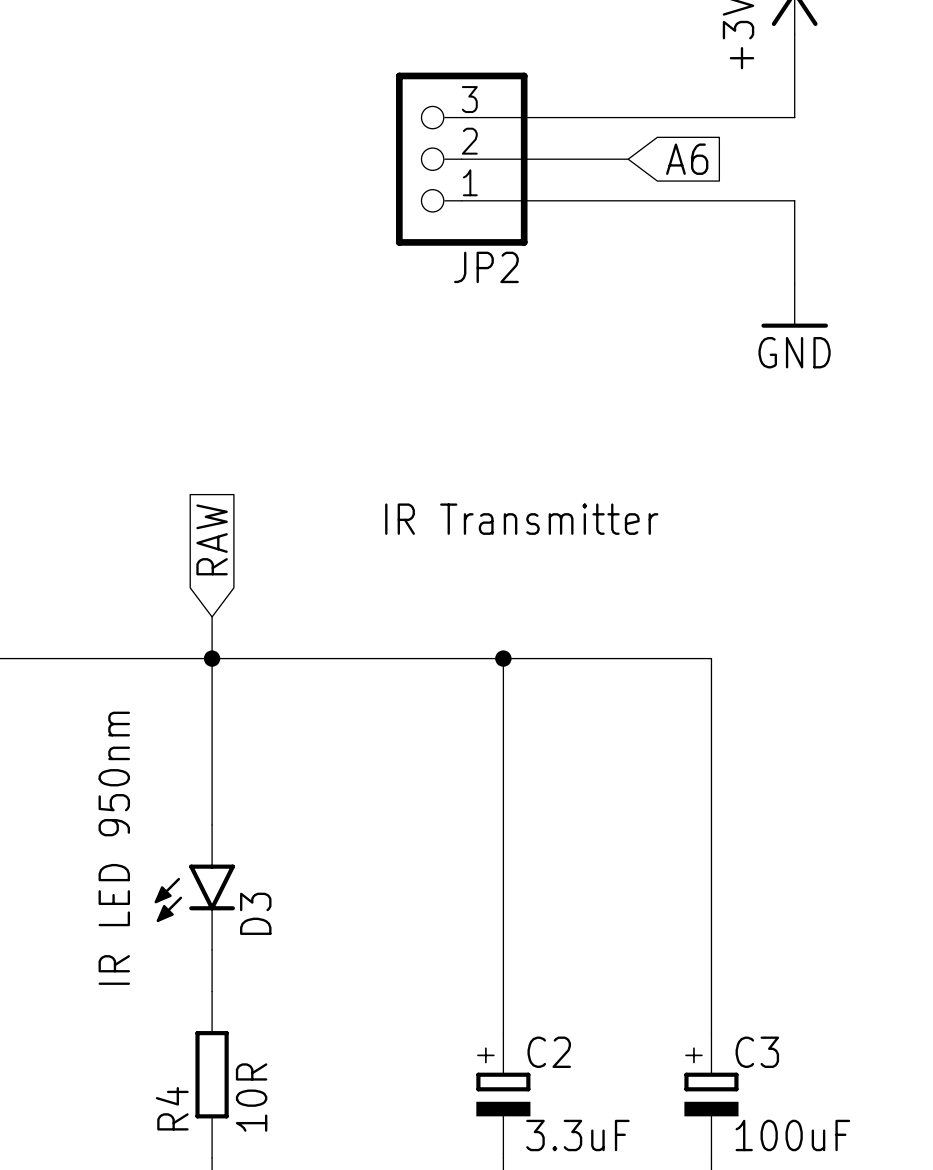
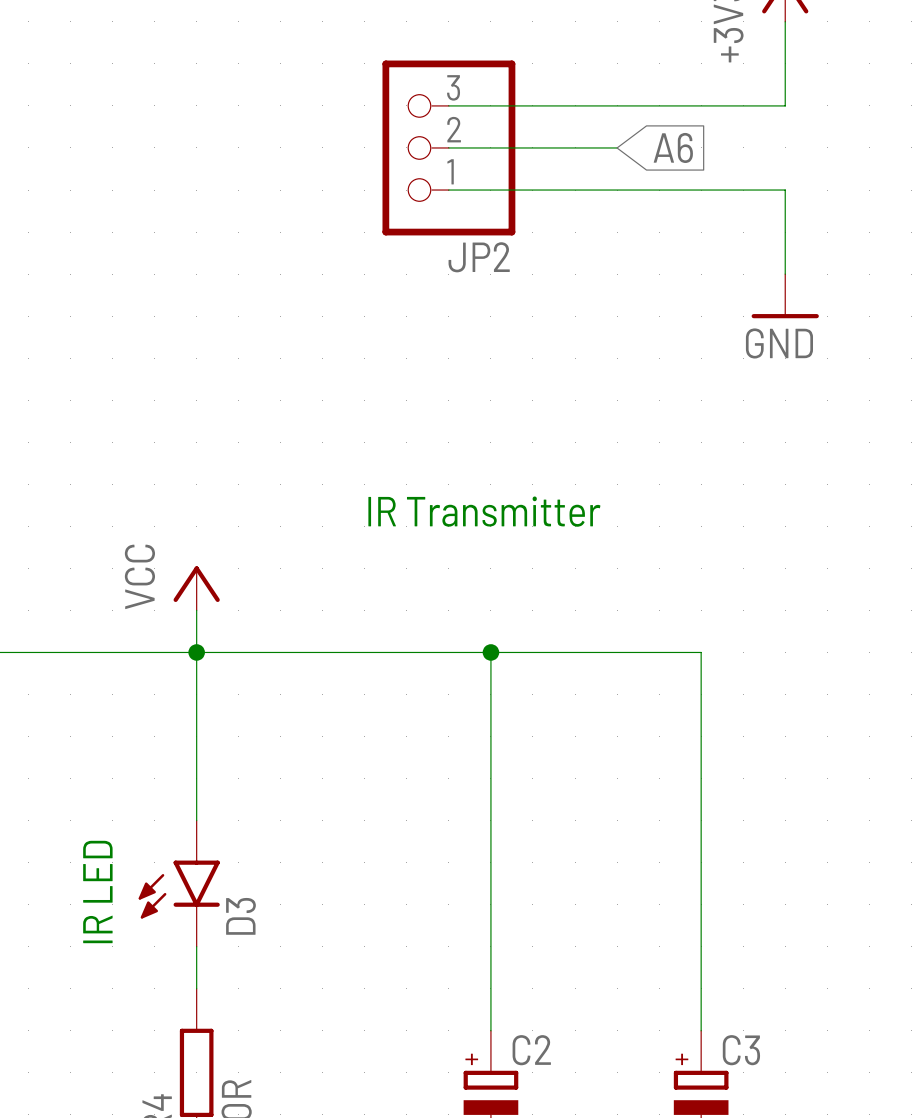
global label: RAW (212, 539) -> none
power symbol: none -> VCC (196, 588)
text: IR LED 950nm (114, 848) -> IR LED (97, 892)

